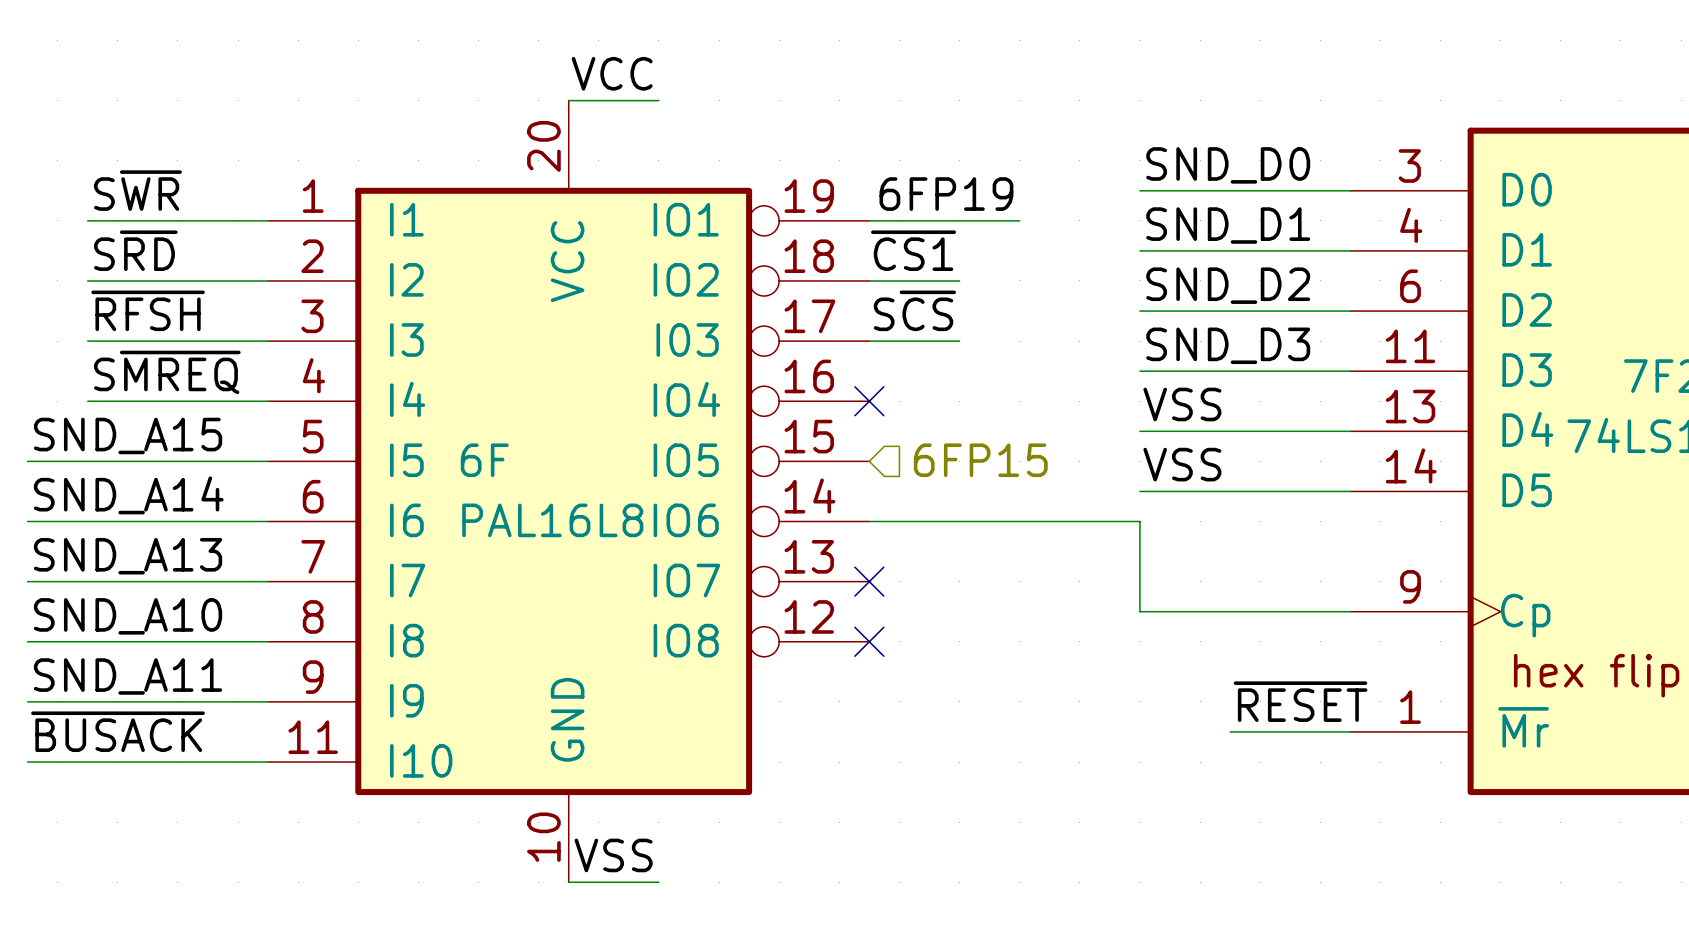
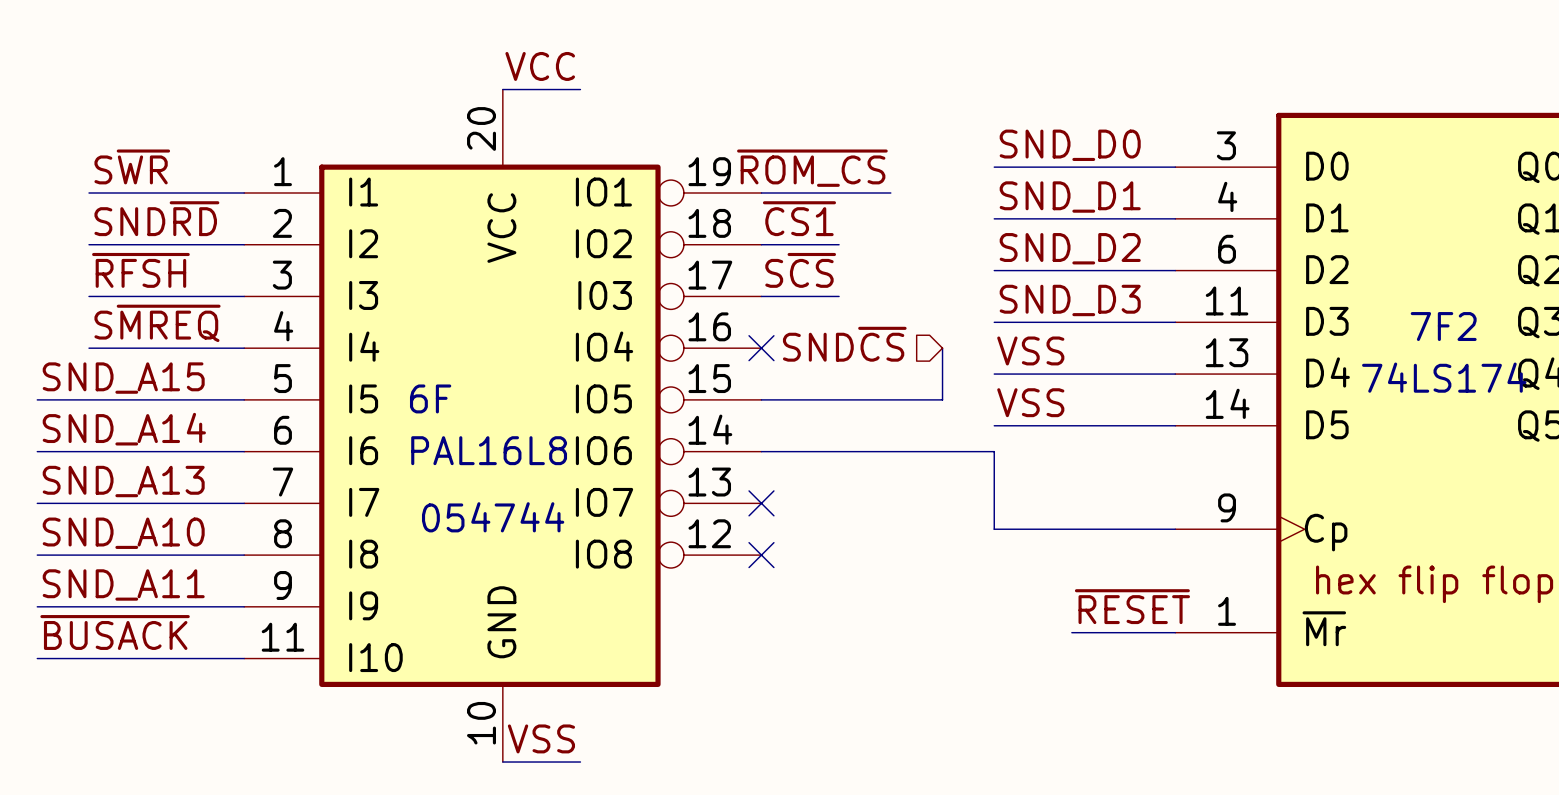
label: 6FP19 (946, 194) -> ~{ROM_CS} (812, 168)
label: S~{RD} (135, 250) -> SND~{RD} (156, 218)
hierarchical label: none -> SND~{CS} (844, 344)
wire: none -> (942, 348) (942, 399) (761, 399)
hierarchical label: 6FP15 (980, 460) -> none
6F text: none -> 054744 (493, 517)

